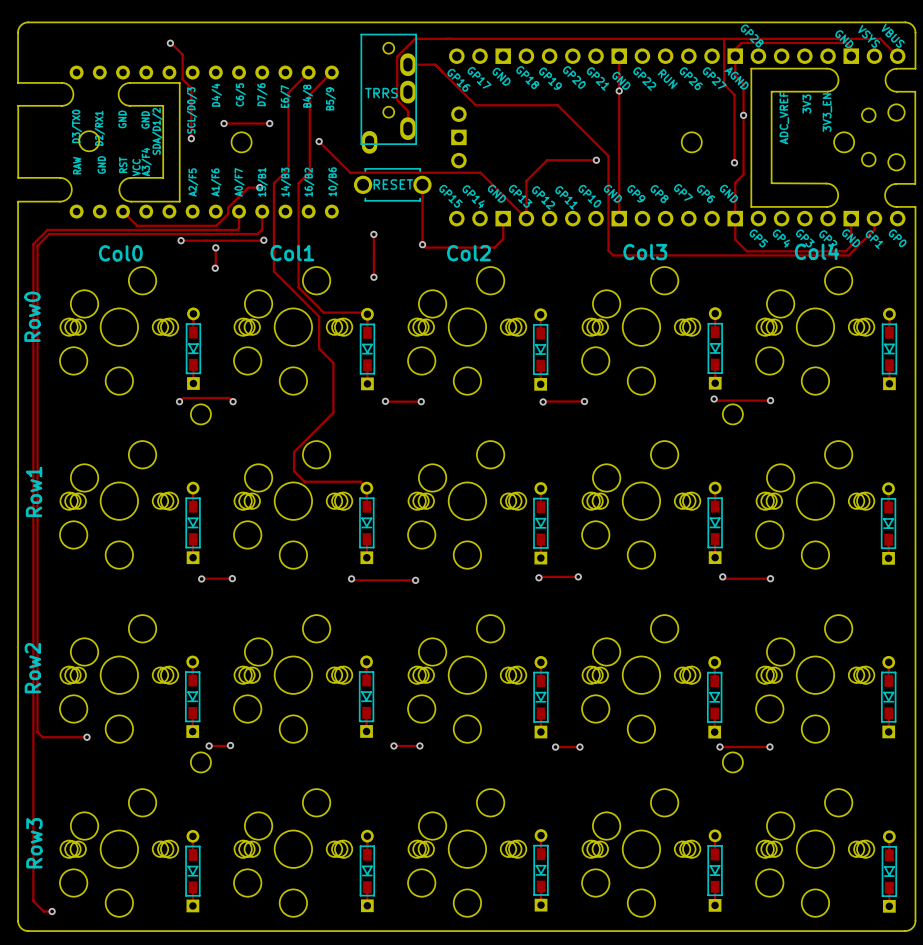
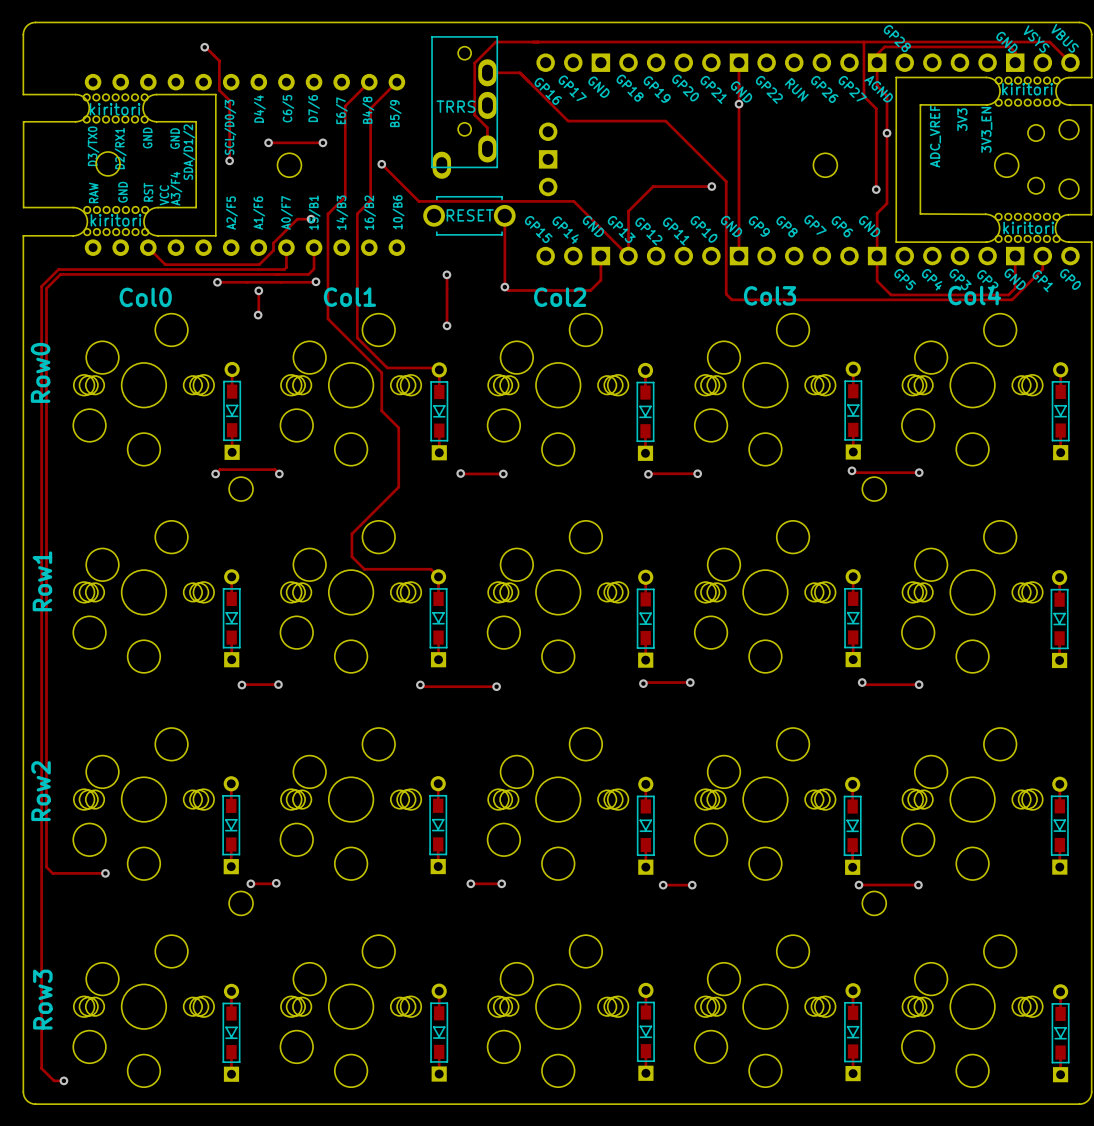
kiritori: none -> (1027, 91)
kiritori: none -> (115, 108)
kiritori: none -> (116, 221)
kiritori: none -> (1027, 227)

